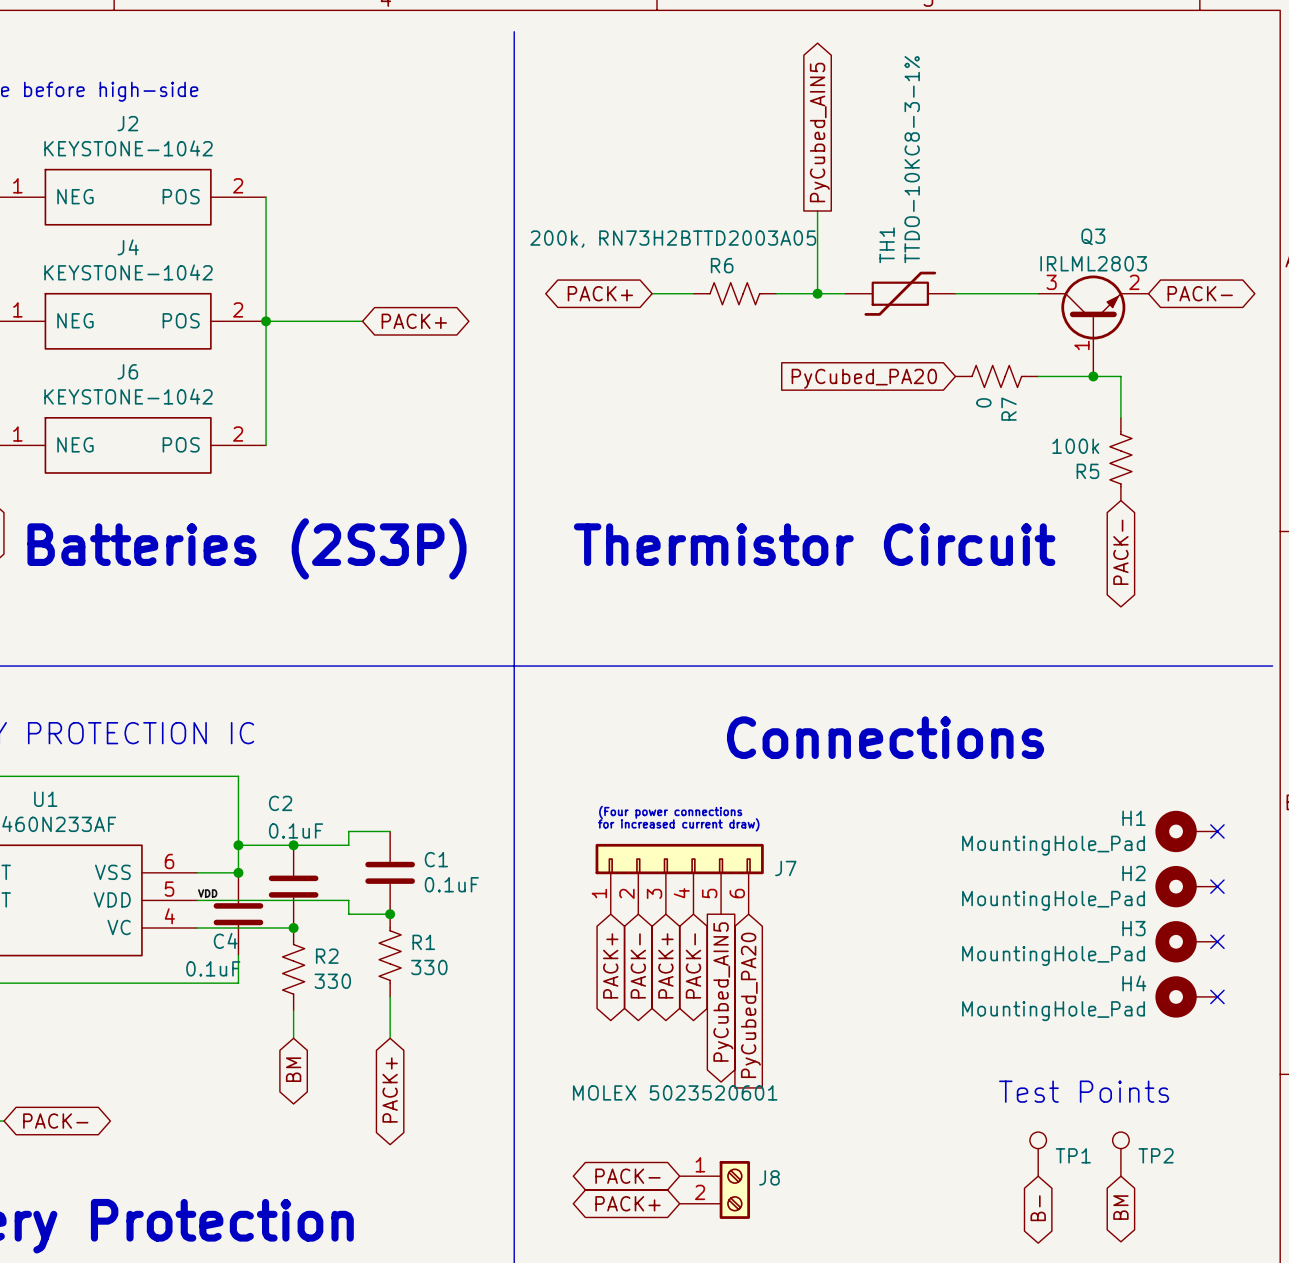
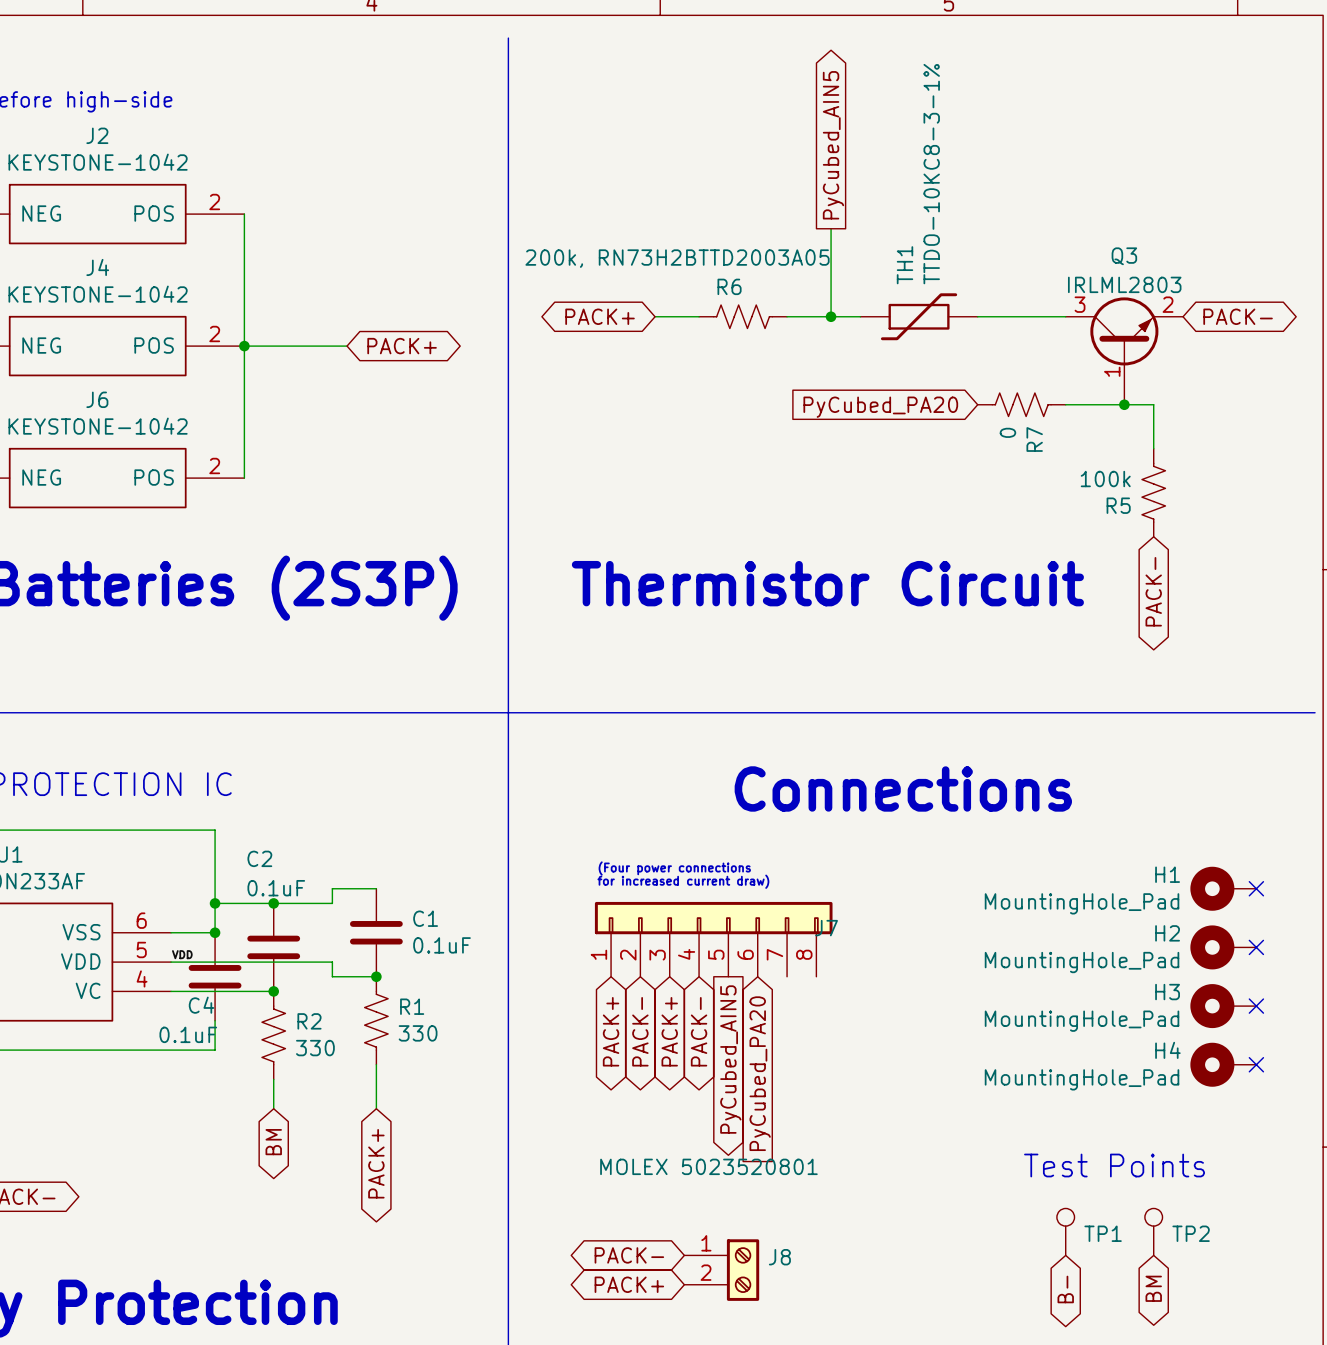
J7 symbol: [595, 843, 764, 915] -> [594, 901, 833, 977]
J7 value: MOLEX 5023520601 (675, 1092) -> MOLEX 5023520801 (708, 1166)

